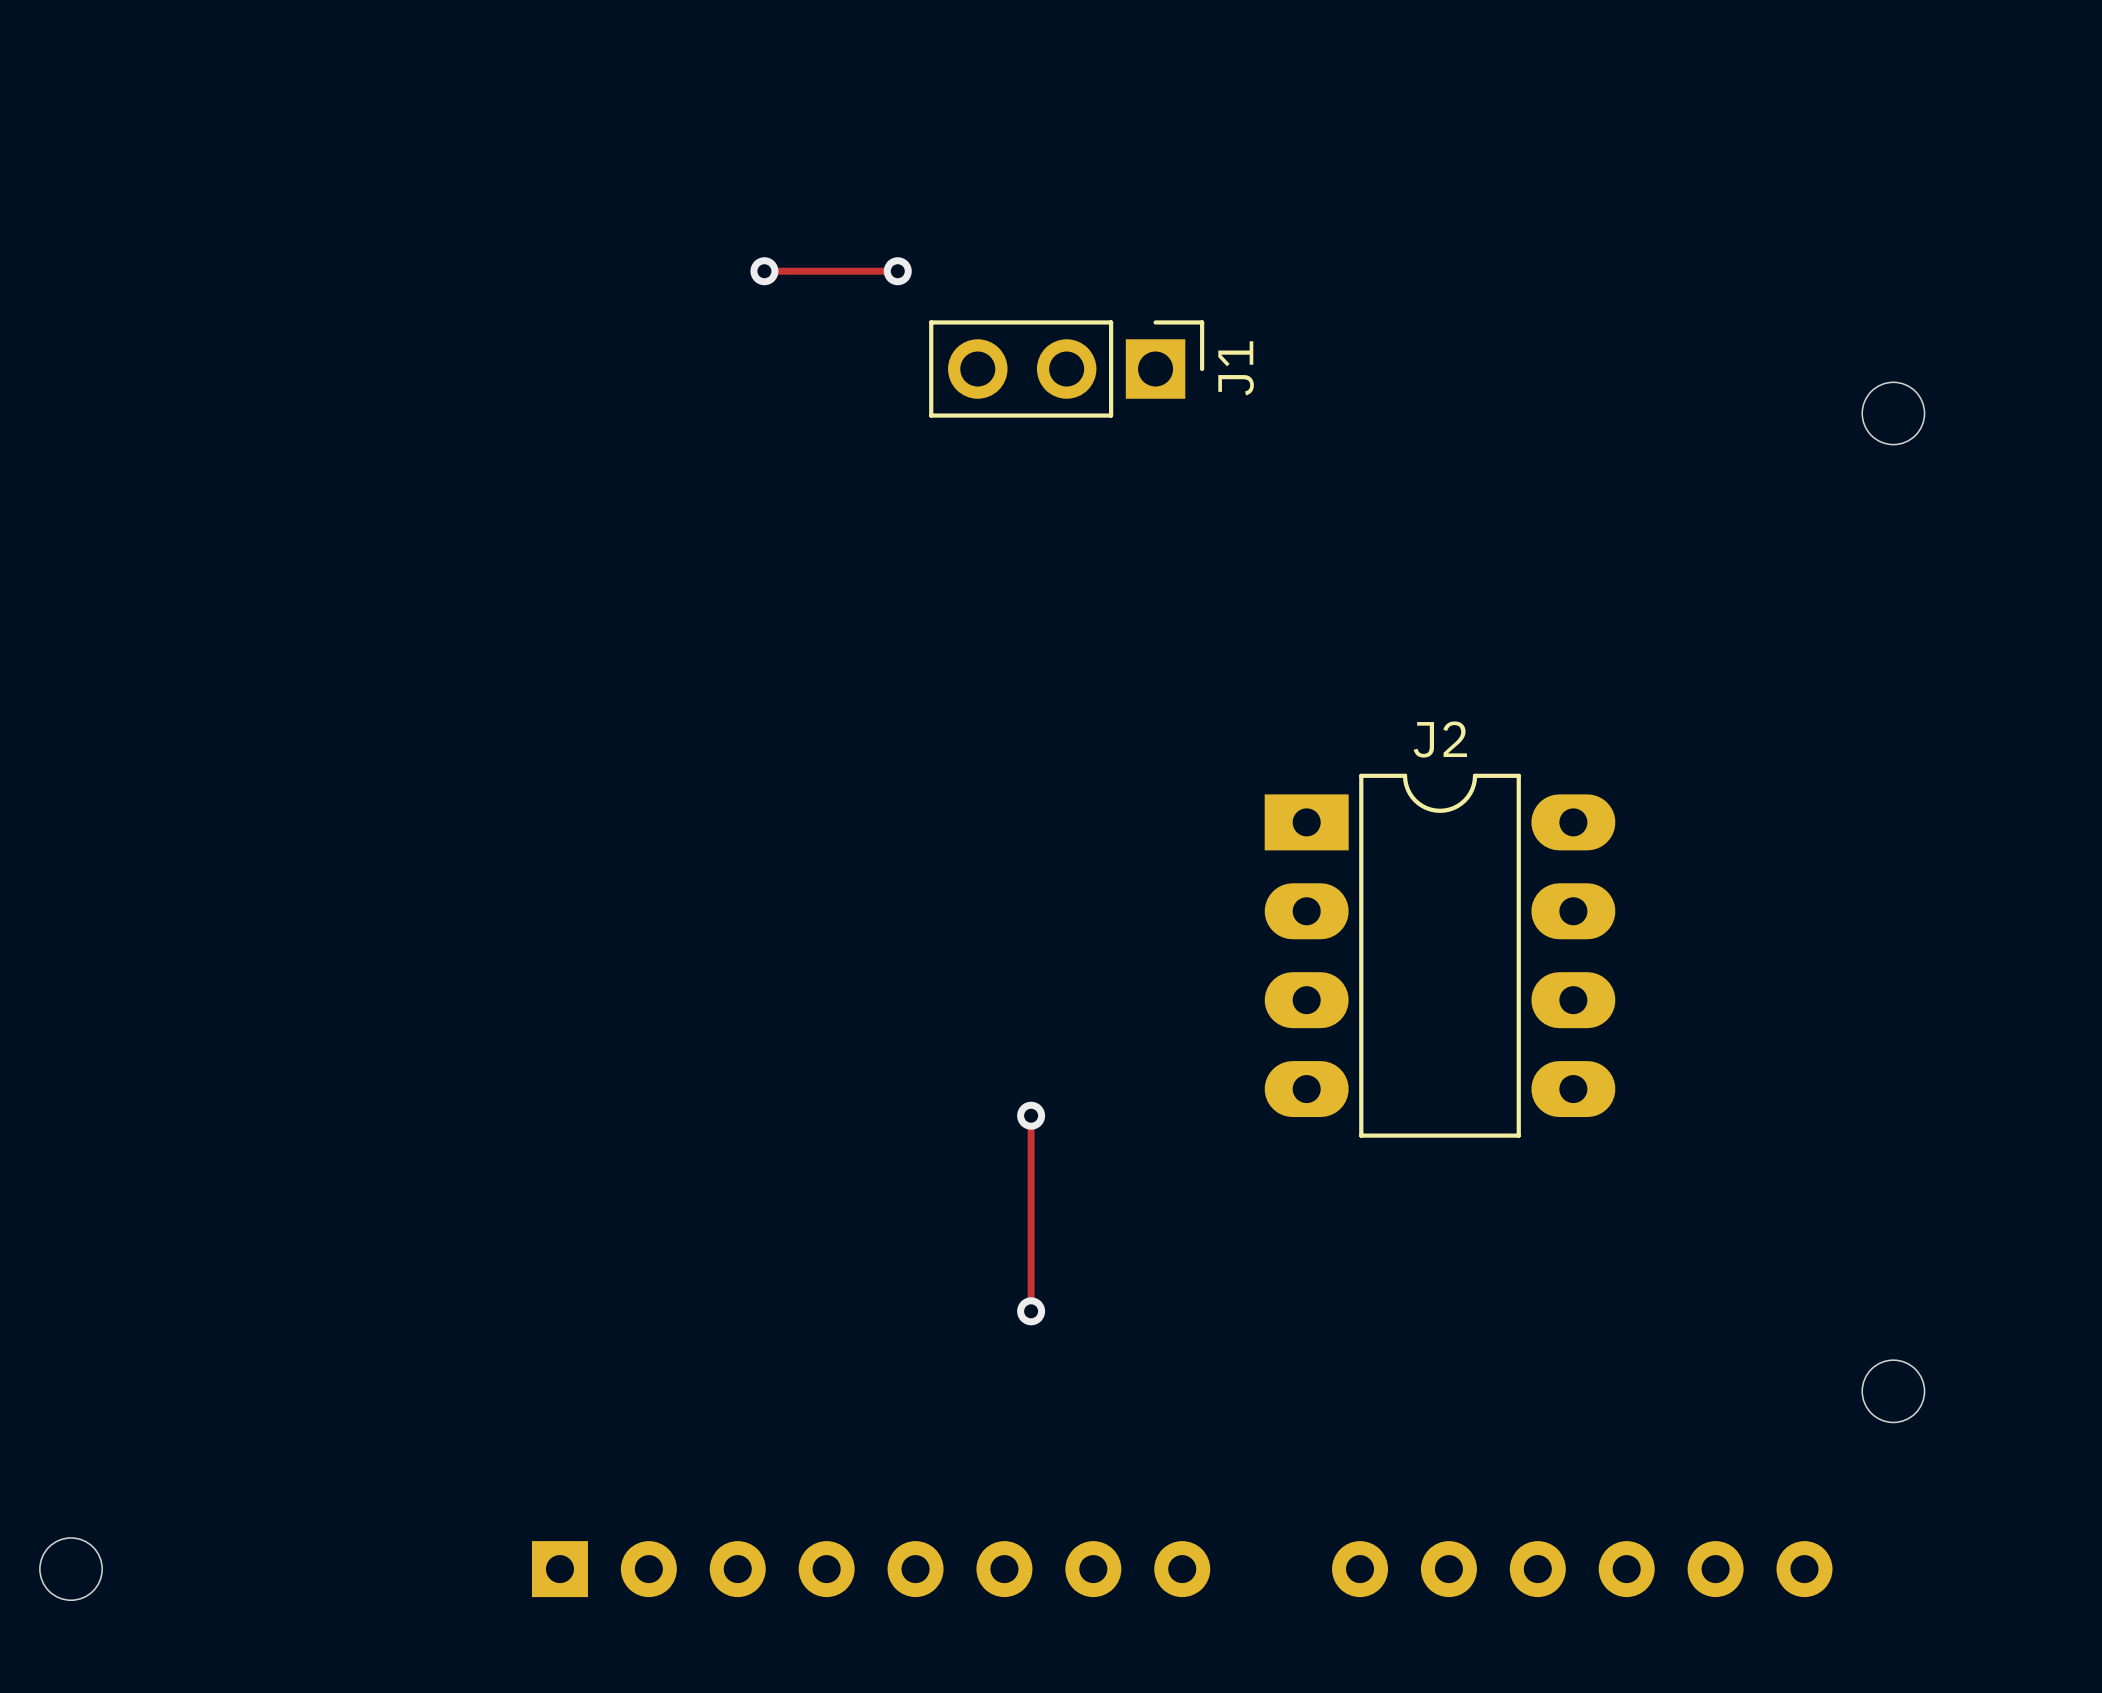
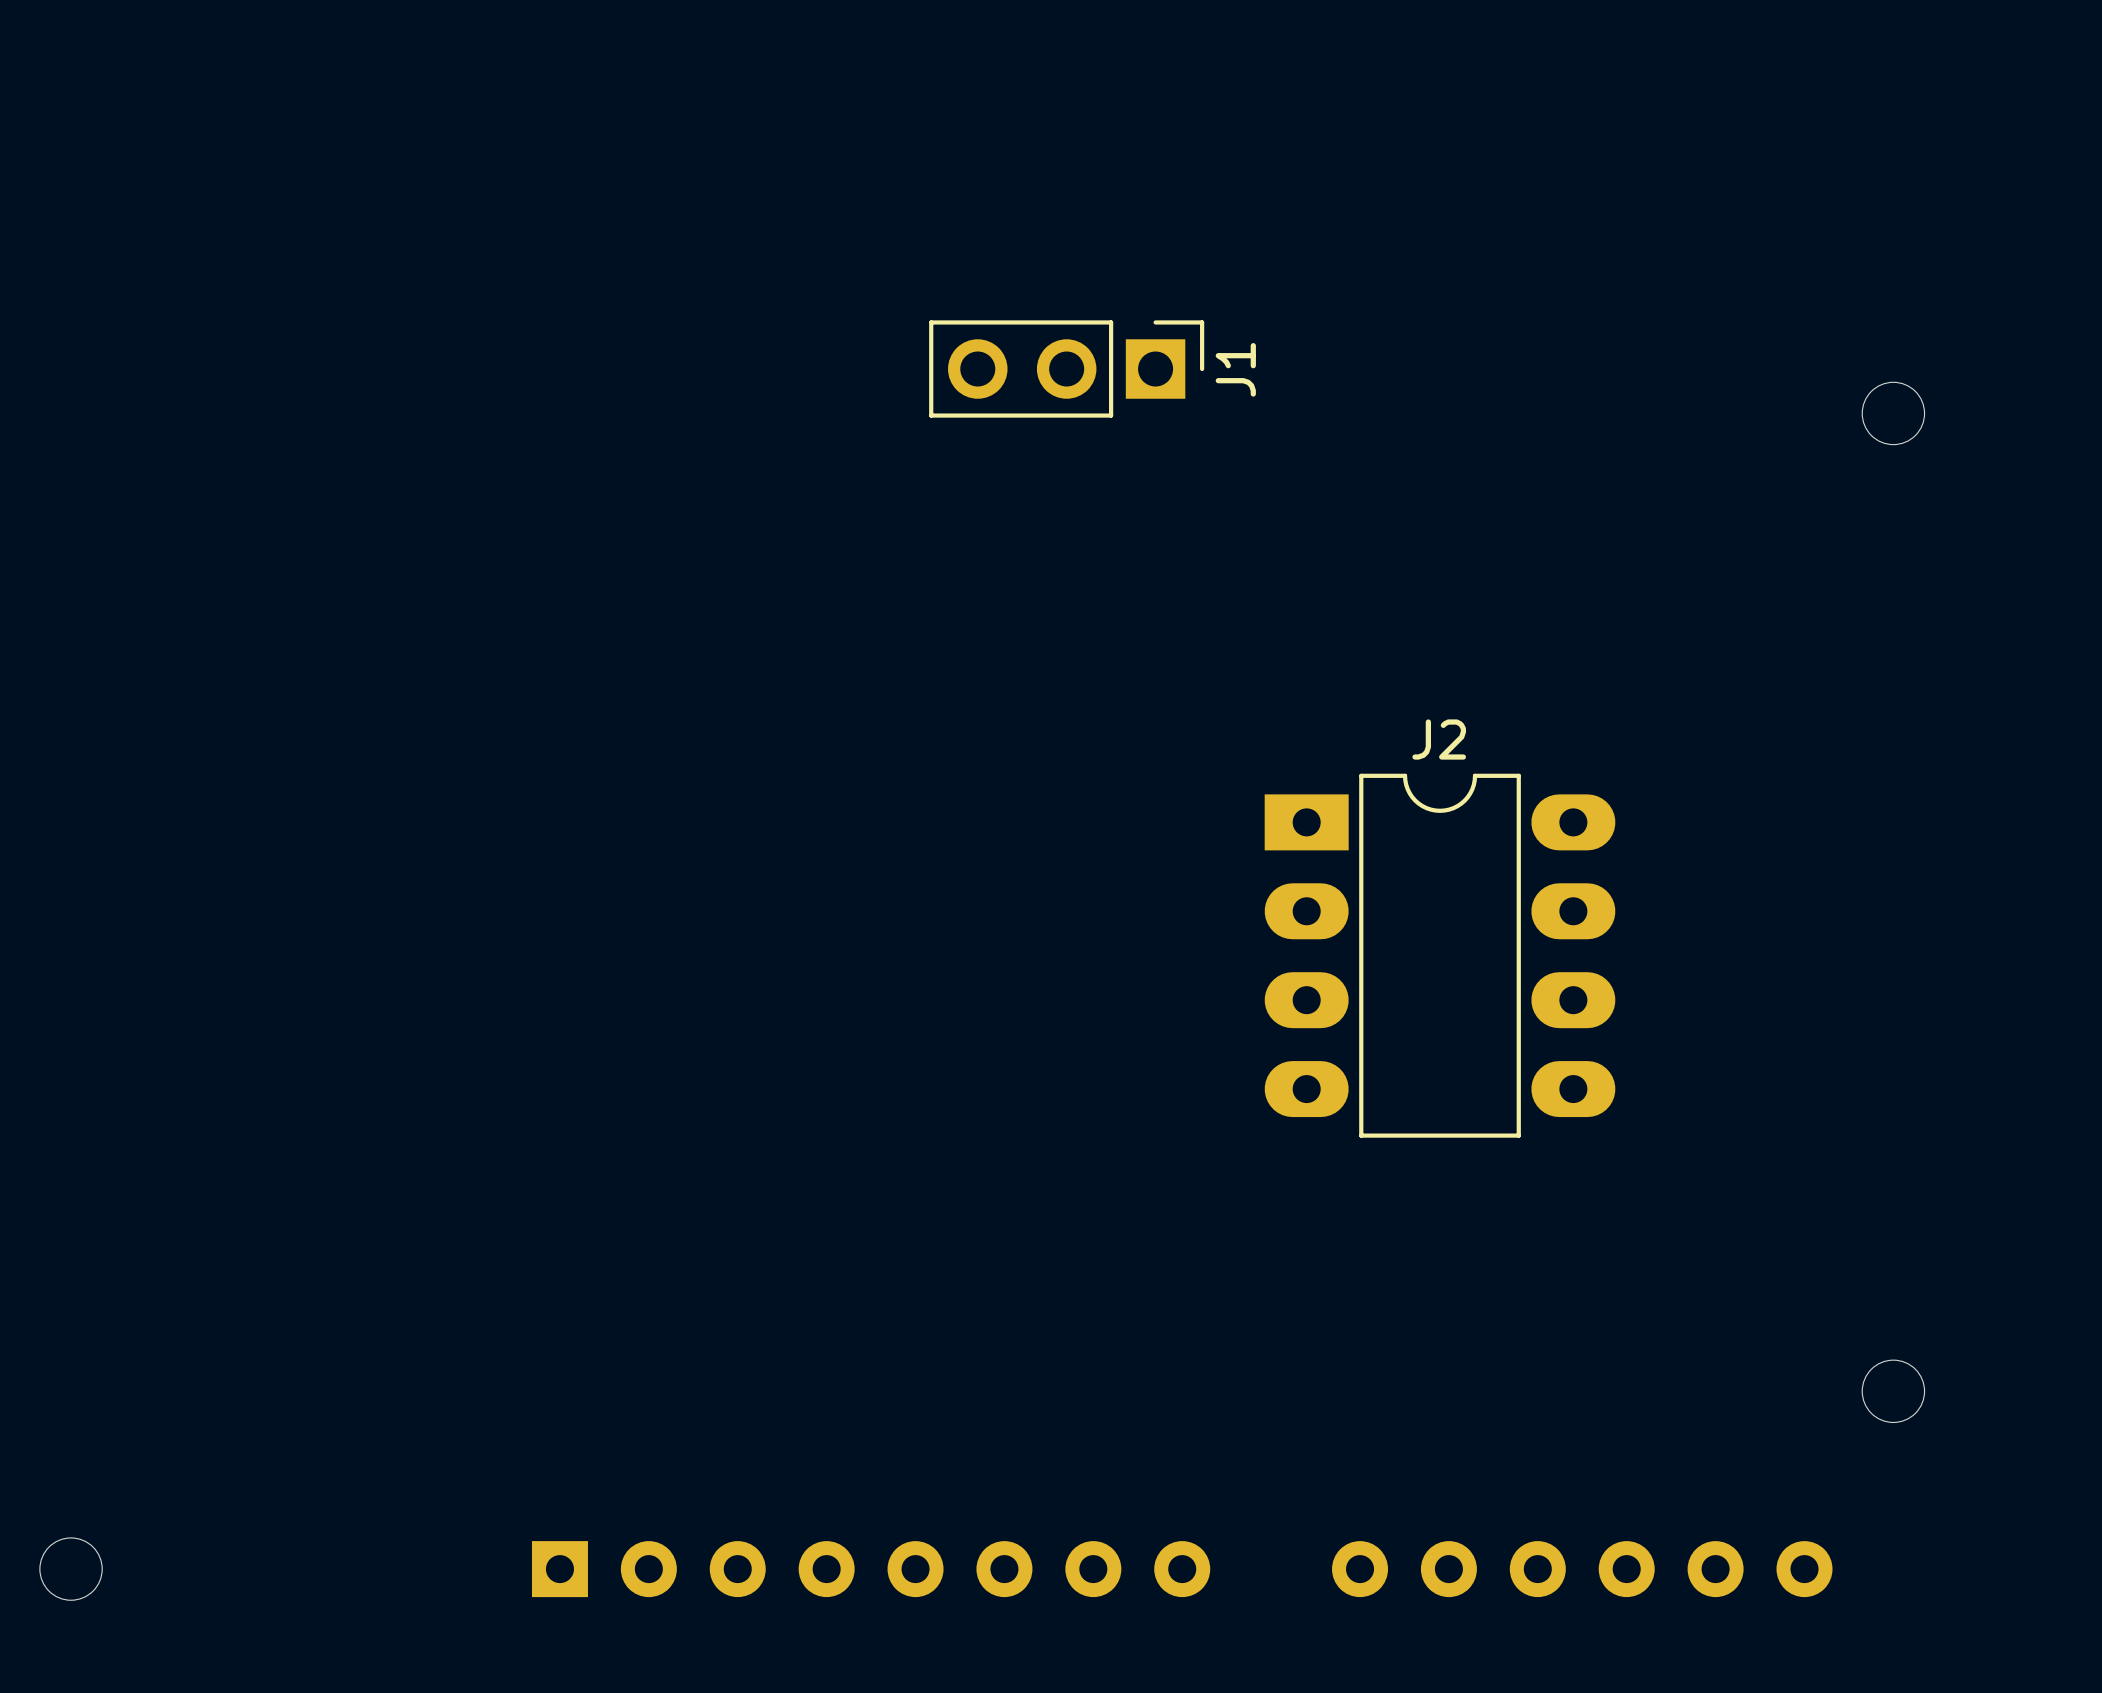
track: (764, 271) (897, 271) -> none
via: (764, 271) -> none
via: (897, 271) -> none
track: (1031, 1115) (1031, 1311) -> none
via: (1031, 1115) -> none
via: (1031, 1311) -> none

